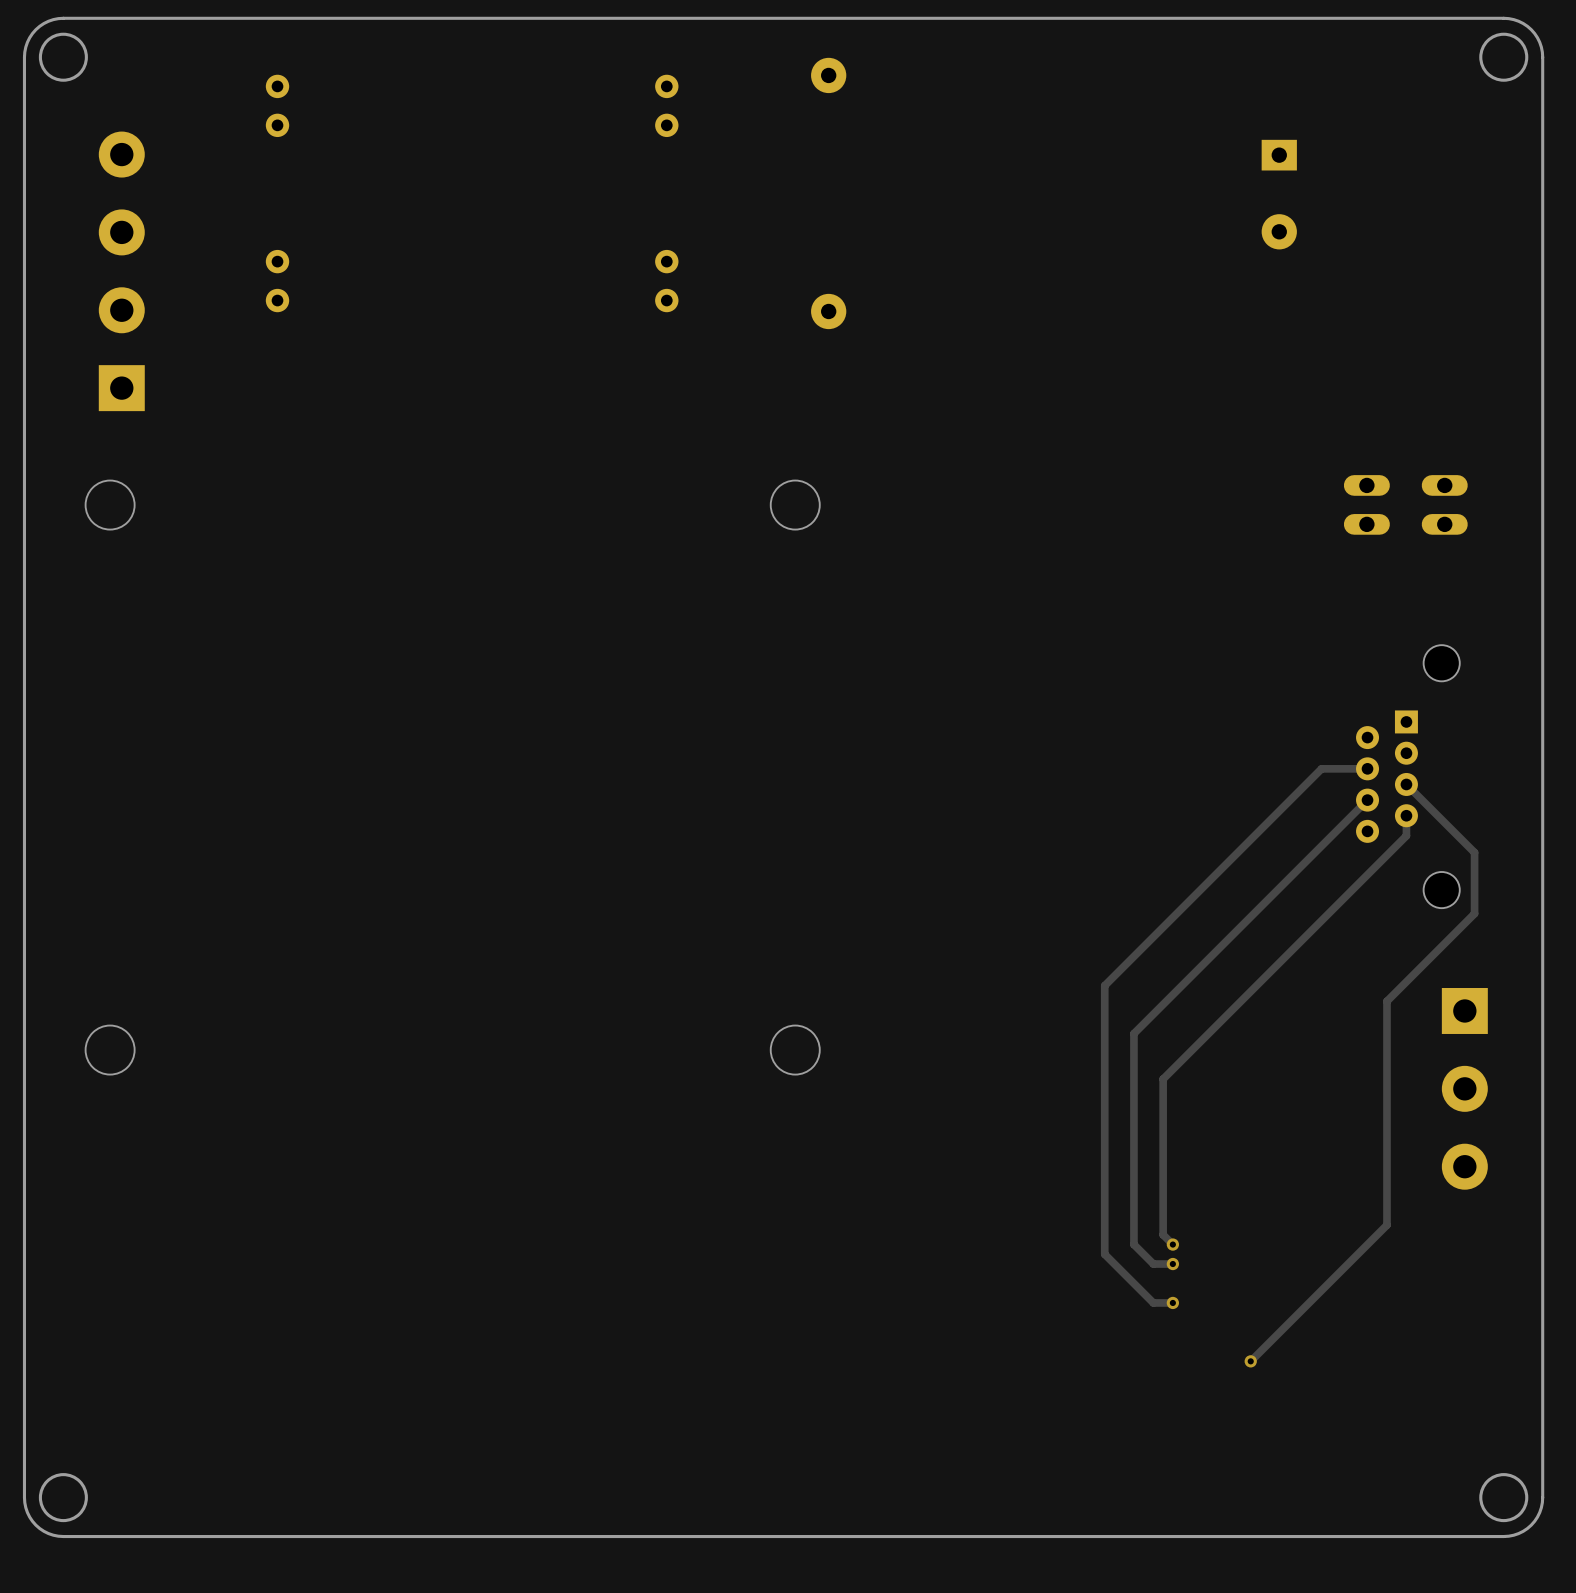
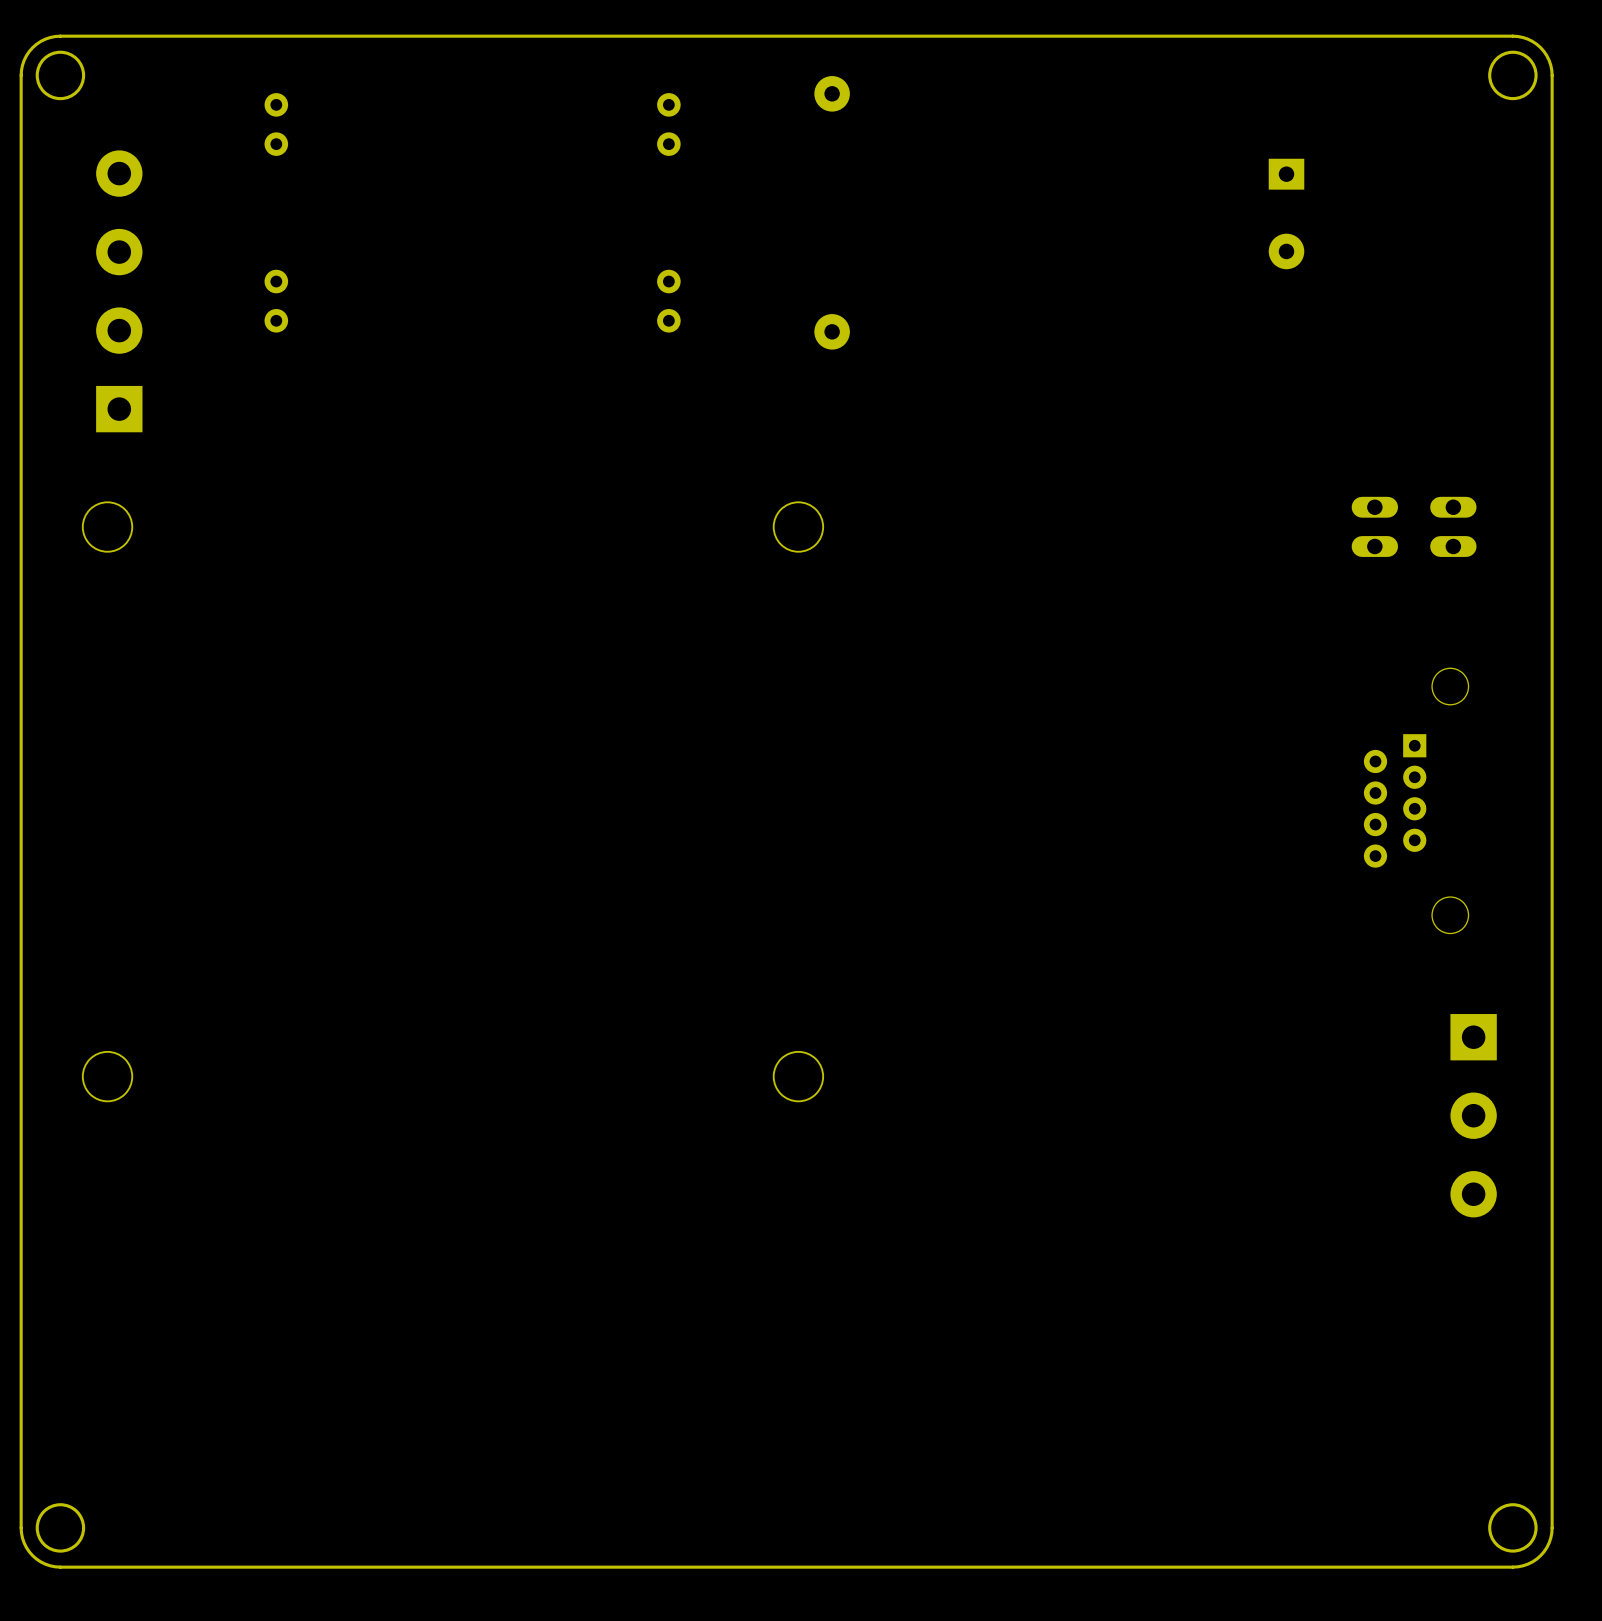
track: (1367, 768) (1321, 768) (1104, 985) (1104, 1254) (1153, 1302) (1172, 1302) -> none
track: (1406, 784) (1474, 852) (1474, 913) (1386, 1001) (1386, 1225) (1250, 1361) -> none
track: (1367, 800) (1133, 1033) (1133, 1244) (1153, 1264) (1172, 1264) -> none
track: (1406, 815) (1406, 835) (1163, 1079) (1163, 1234) (1172, 1244) -> none
via: (1172, 1244) -> none
via: (1172, 1264) -> none
via: (1172, 1302) -> none
via: (1250, 1361) -> none

